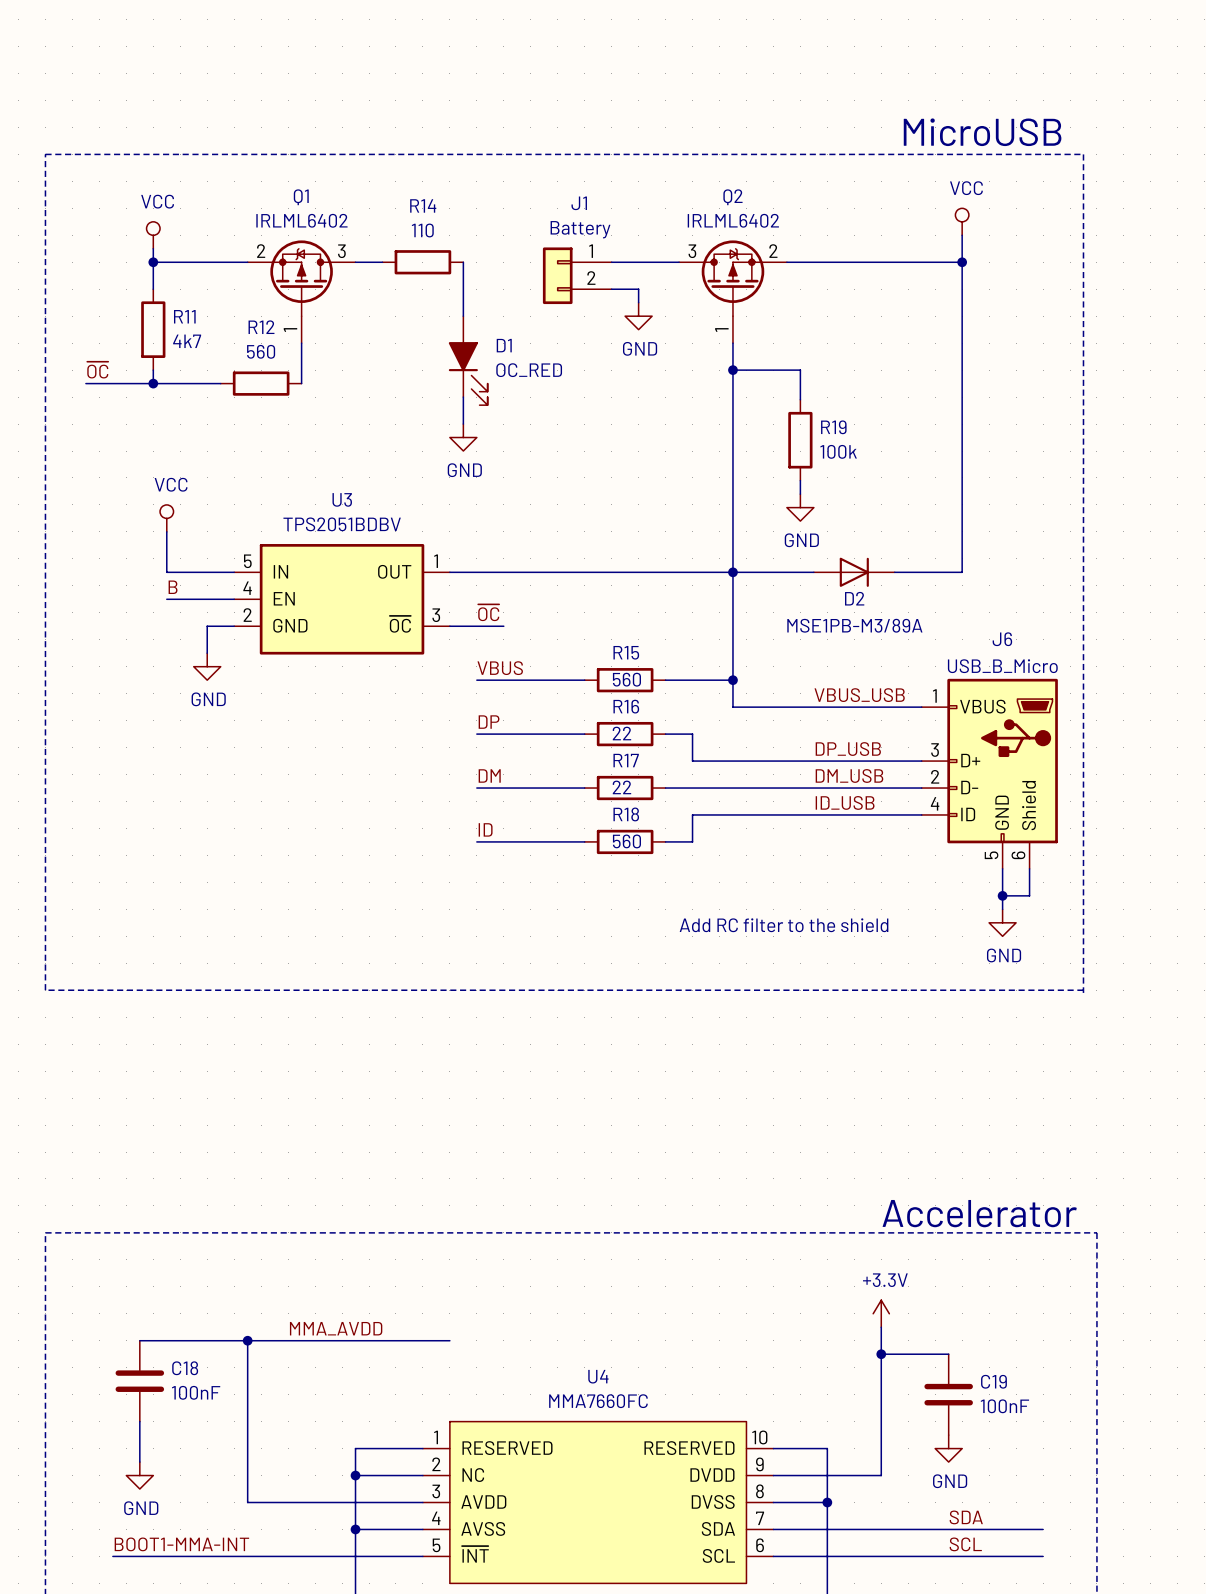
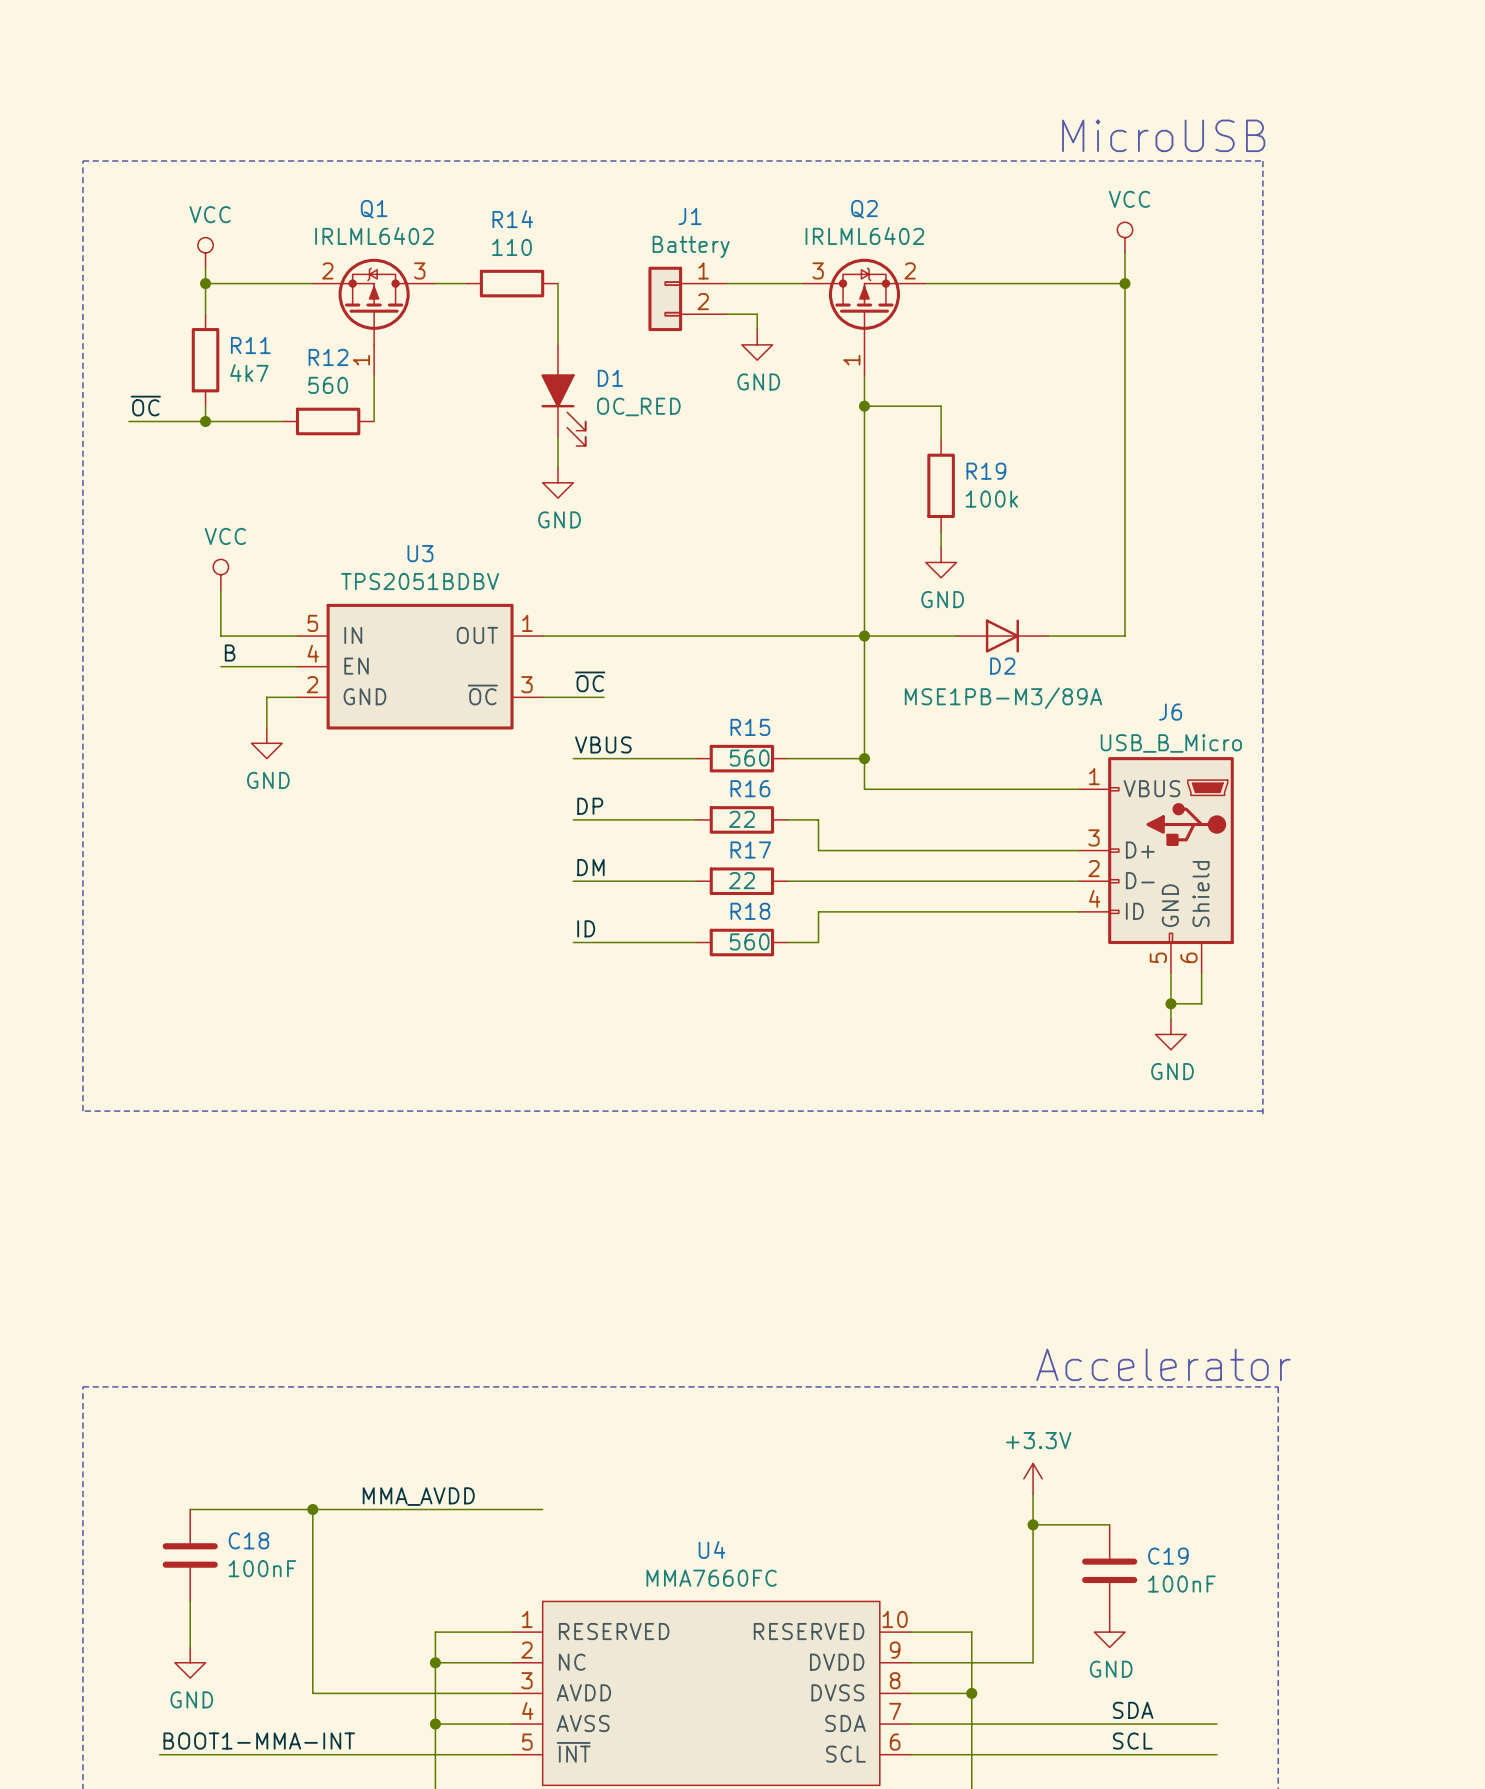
label: VBUS_USB (859, 695) -> none
label: DP_USB (848, 749) -> none
label: DM_USB (849, 775) -> none
label: ID_USB (845, 802) -> none
text: Add RC filter to the shield (784, 925) -> none

